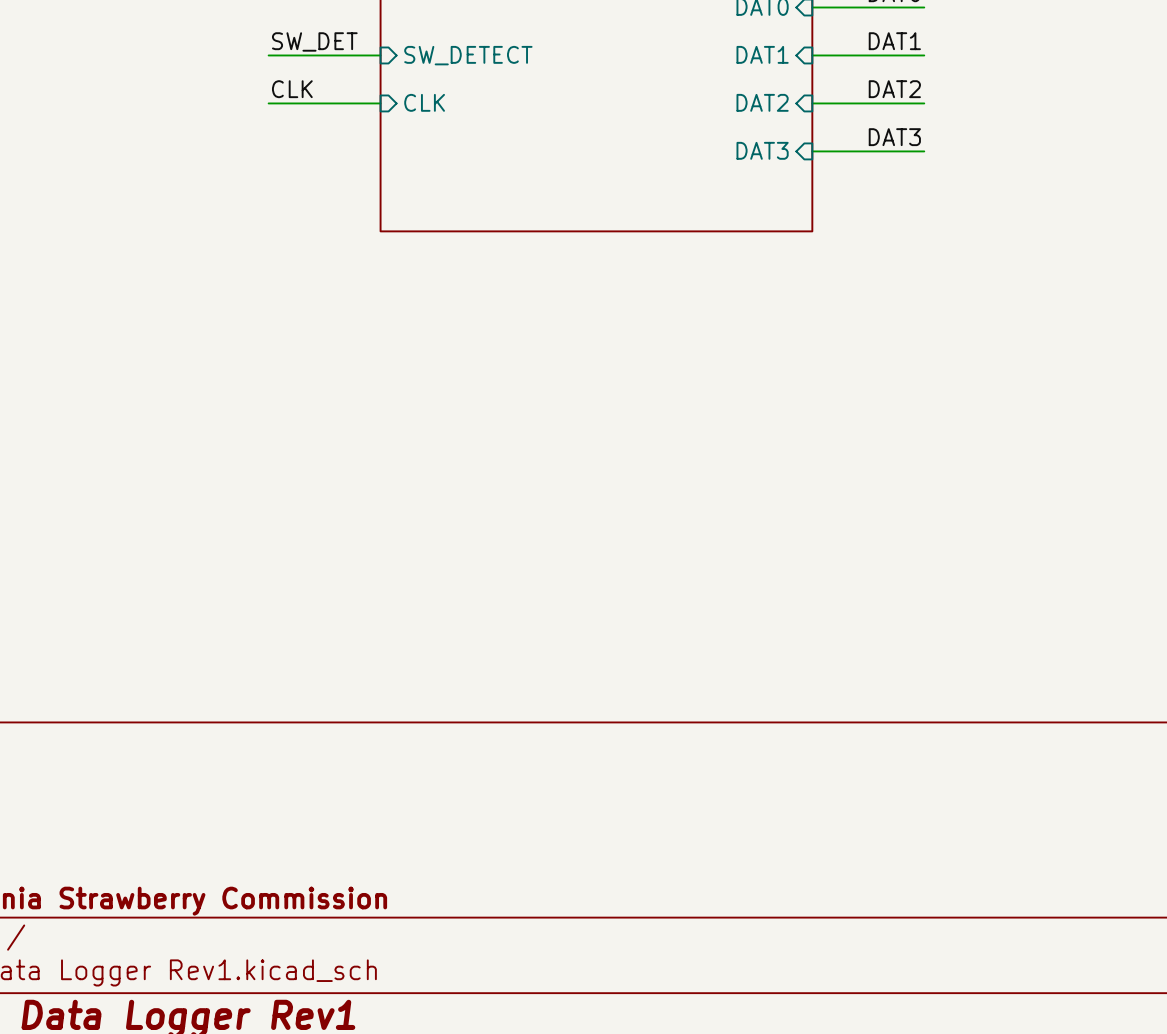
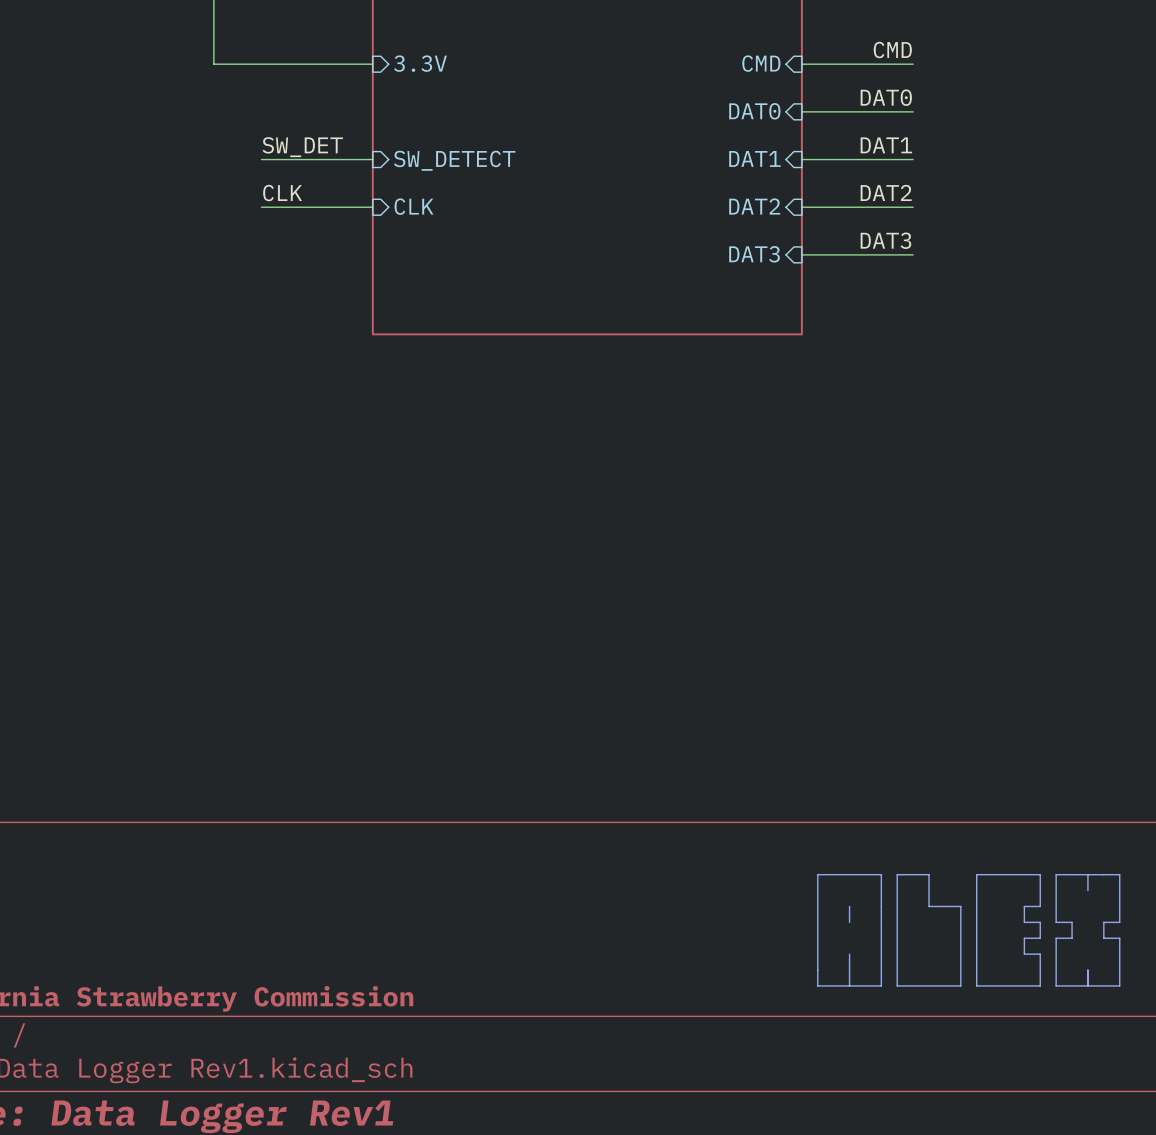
line: none -> (817, 874) (817, 985) (881, 985) (881, 874) (817, 874)
line: none -> (897, 874) (929, 874) (929, 906) (960, 906) (960, 985) (897, 985) (897, 874)
line: none -> (976, 874) (1040, 874) (1040, 906) (1024, 906) (1024, 922) (1040, 922) (1040, 938) (1024, 938) (1024, 954) (1040, 954) (1040, 985) (976, 985) (976, 874)
line: none -> (1056, 874) (1119, 874) (1119, 922) (1103, 922) (1103, 938) (1119, 938) (1119, 985) (1056, 985) (1056, 938) (1072, 938) (1072, 922) (1056, 922) (1056, 874)
line: none -> (1087, 874) (1087, 890)
line: none -> (849, 906) (849, 922)
line: none -> (849, 954) (849, 985)
line: none -> (1087, 970) (1087, 985)

